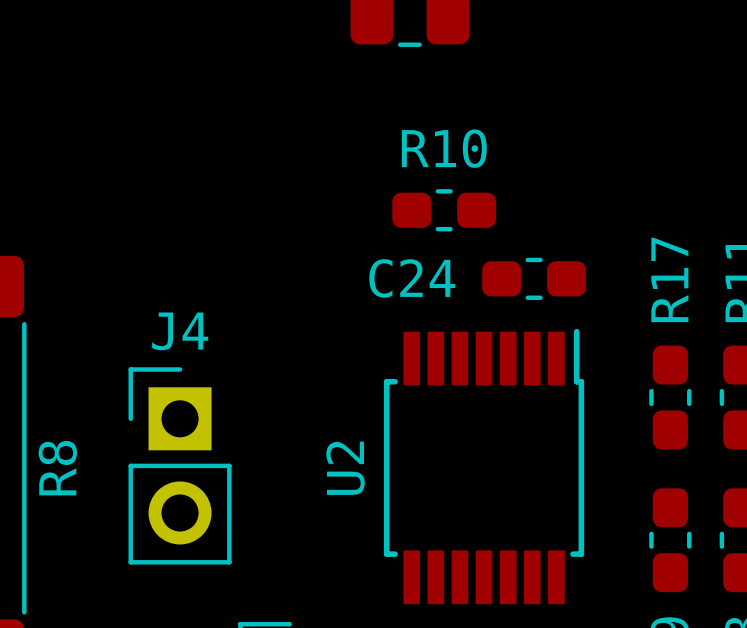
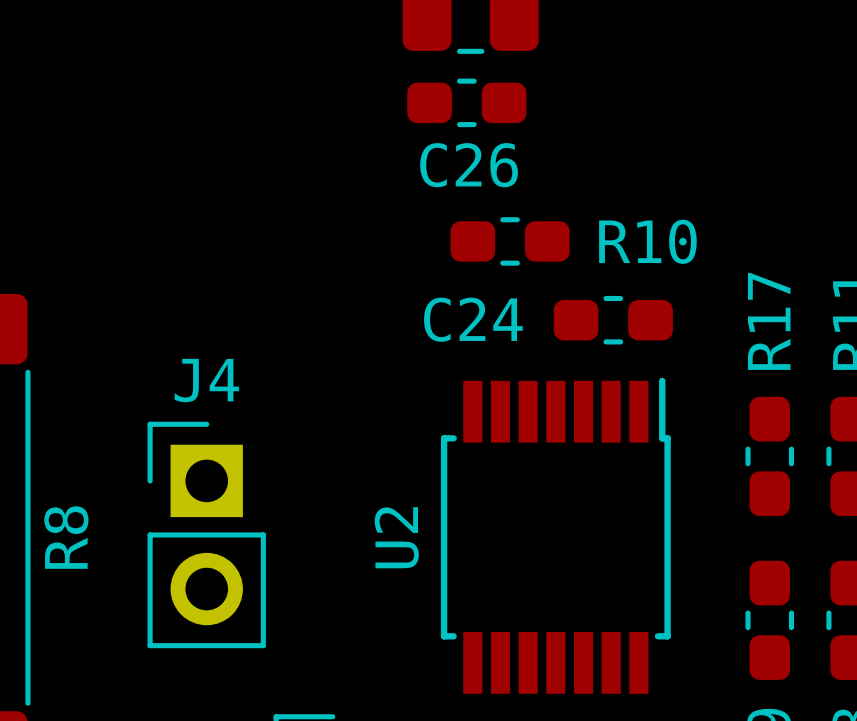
C26: none -> (466, 102)
R10 name position: R10 (444, 148) -> R10 (647, 241)

